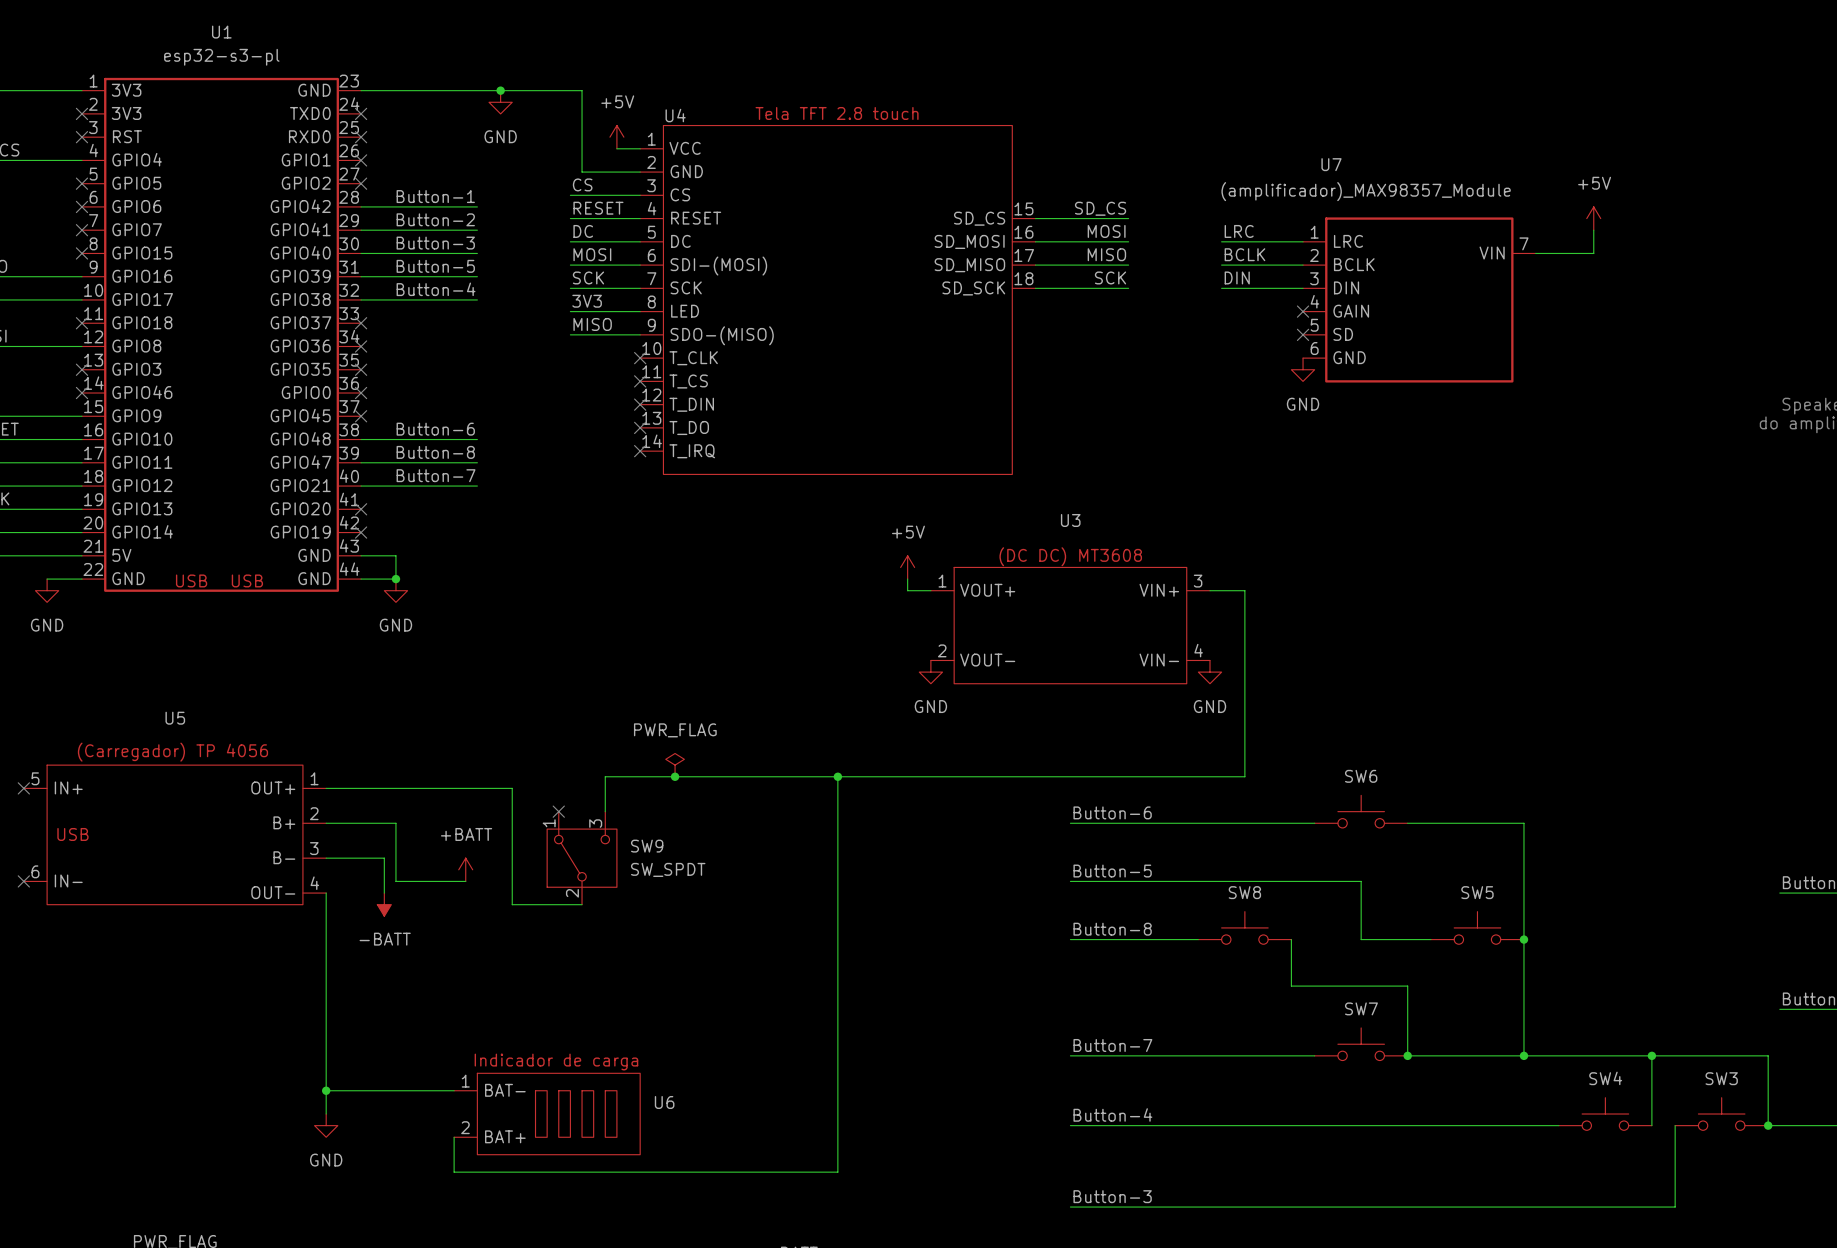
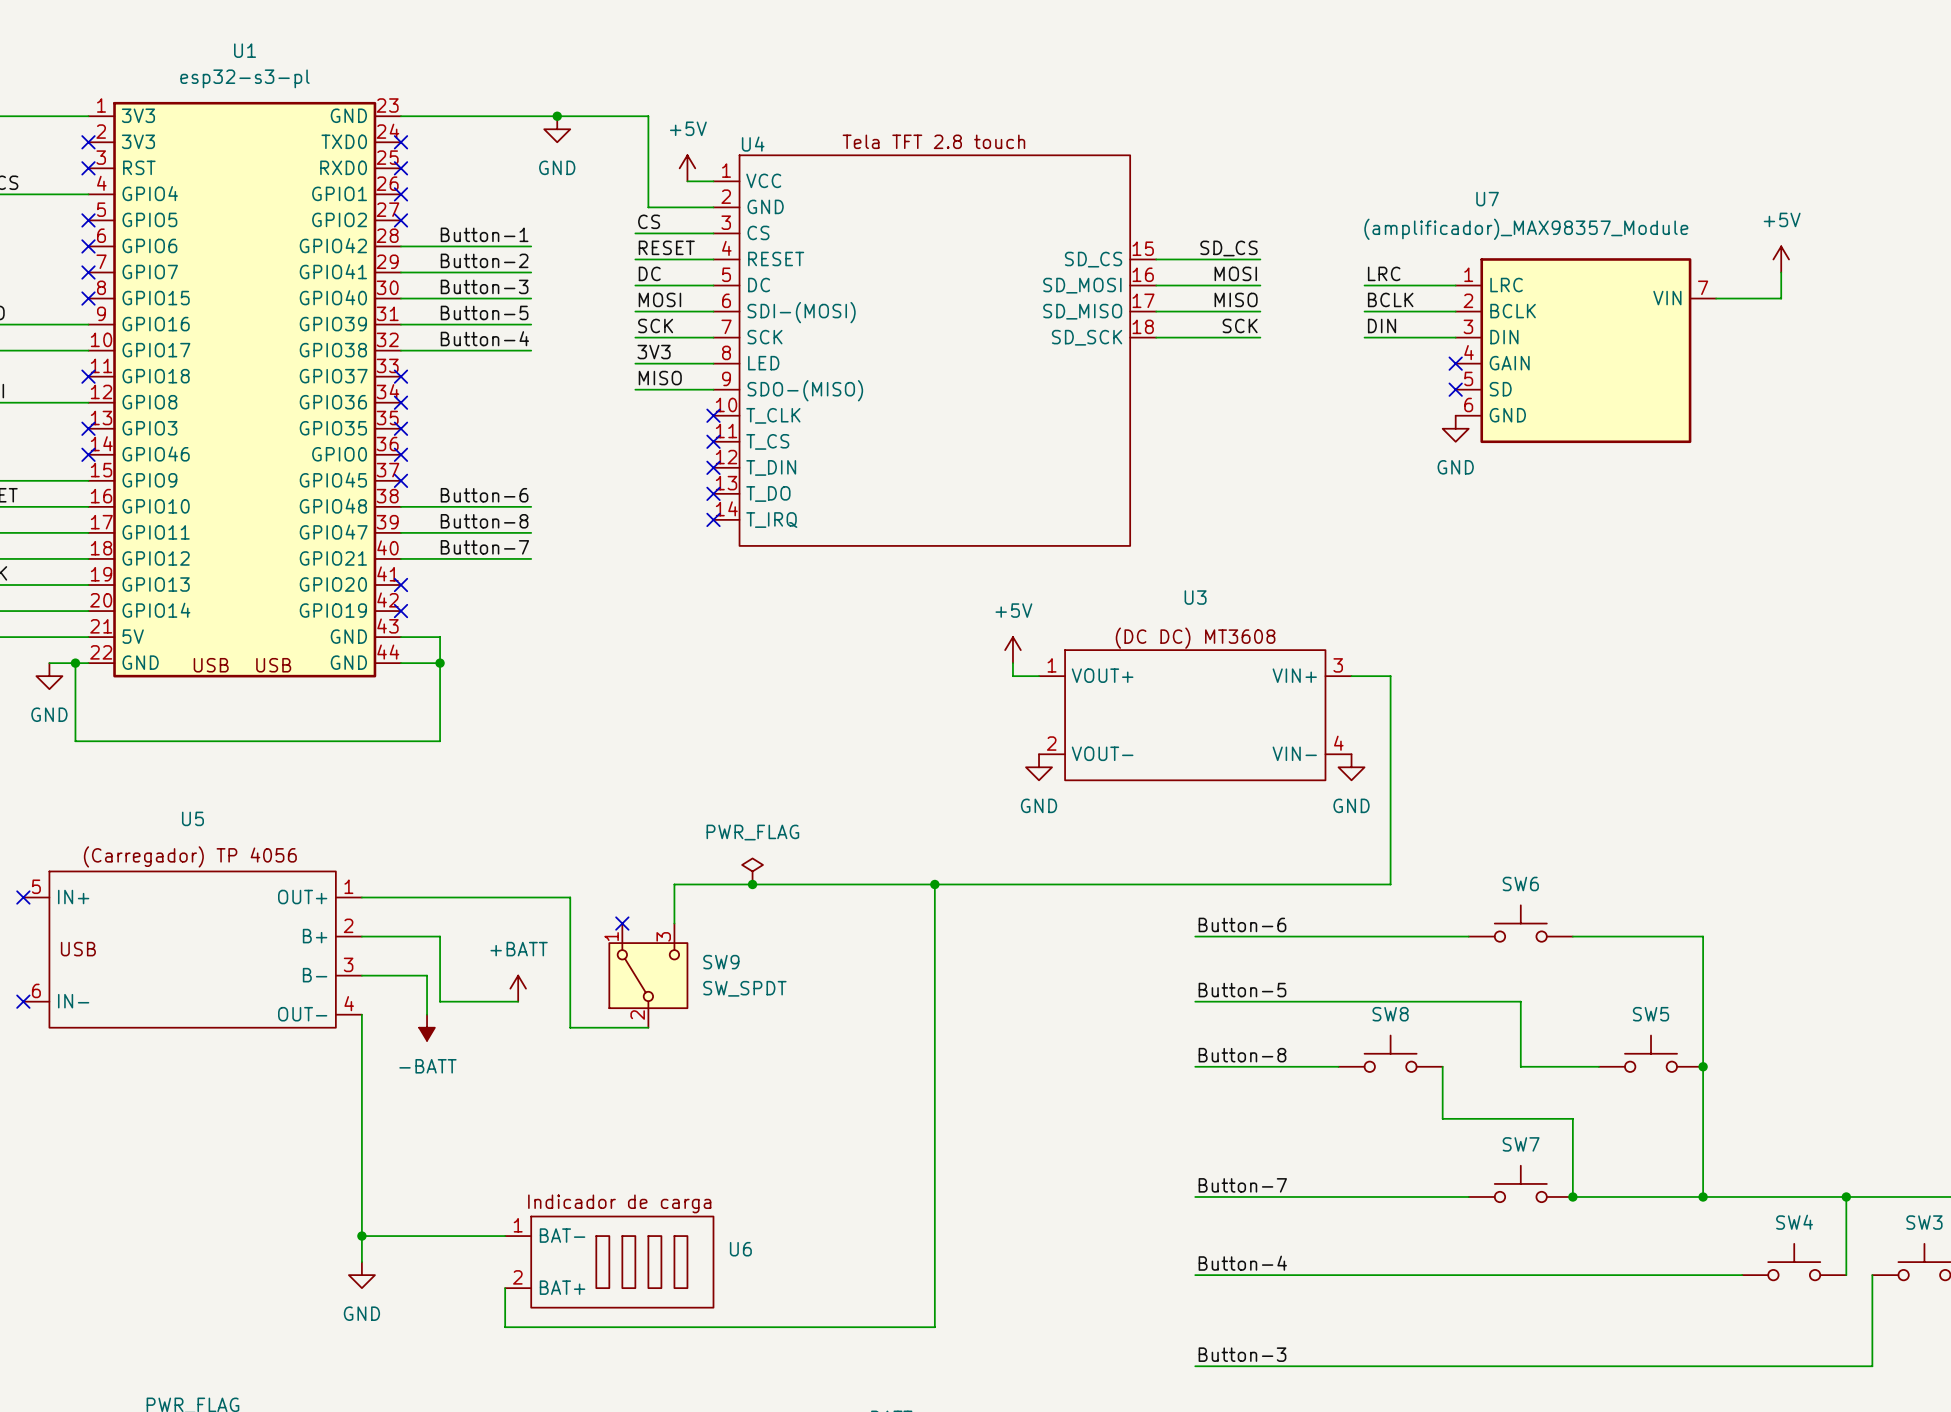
wire: none -> (75, 663) (75, 741) (440, 741) (440, 663)
junction: none -> (75, 663)
power symbol: GND (395, 590) -> none

